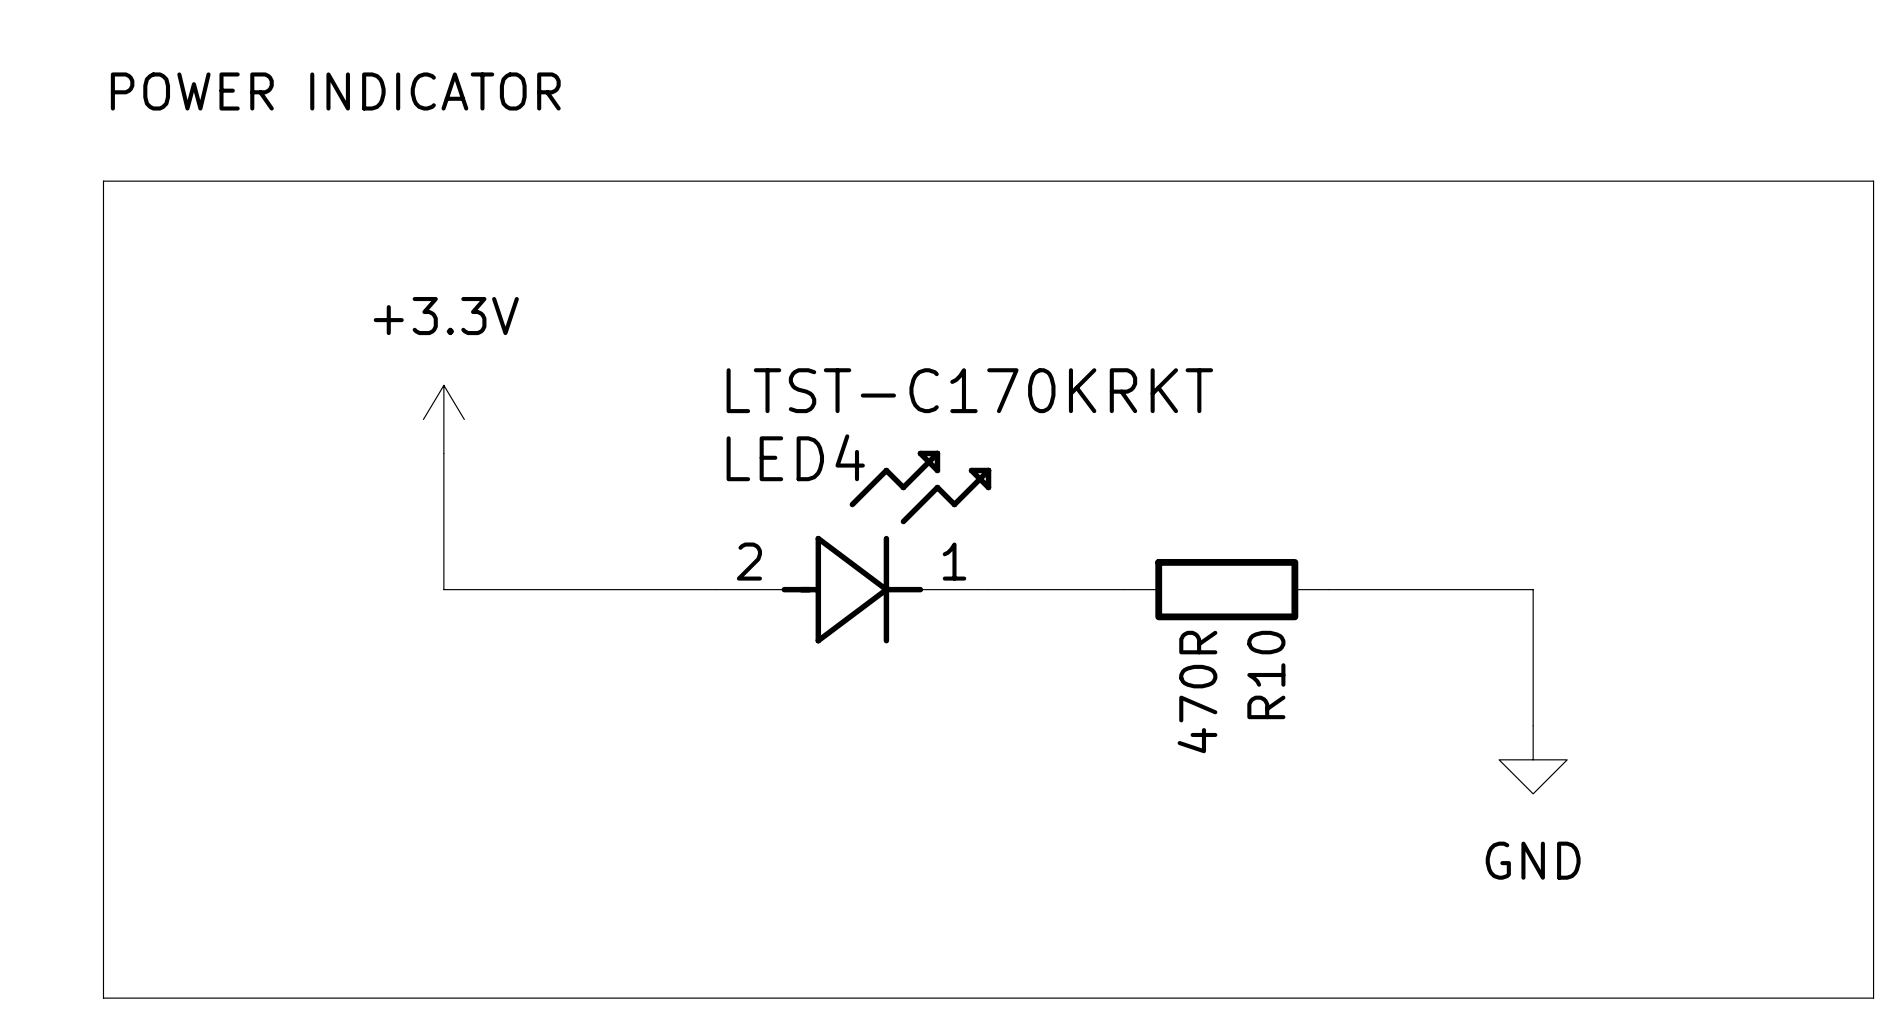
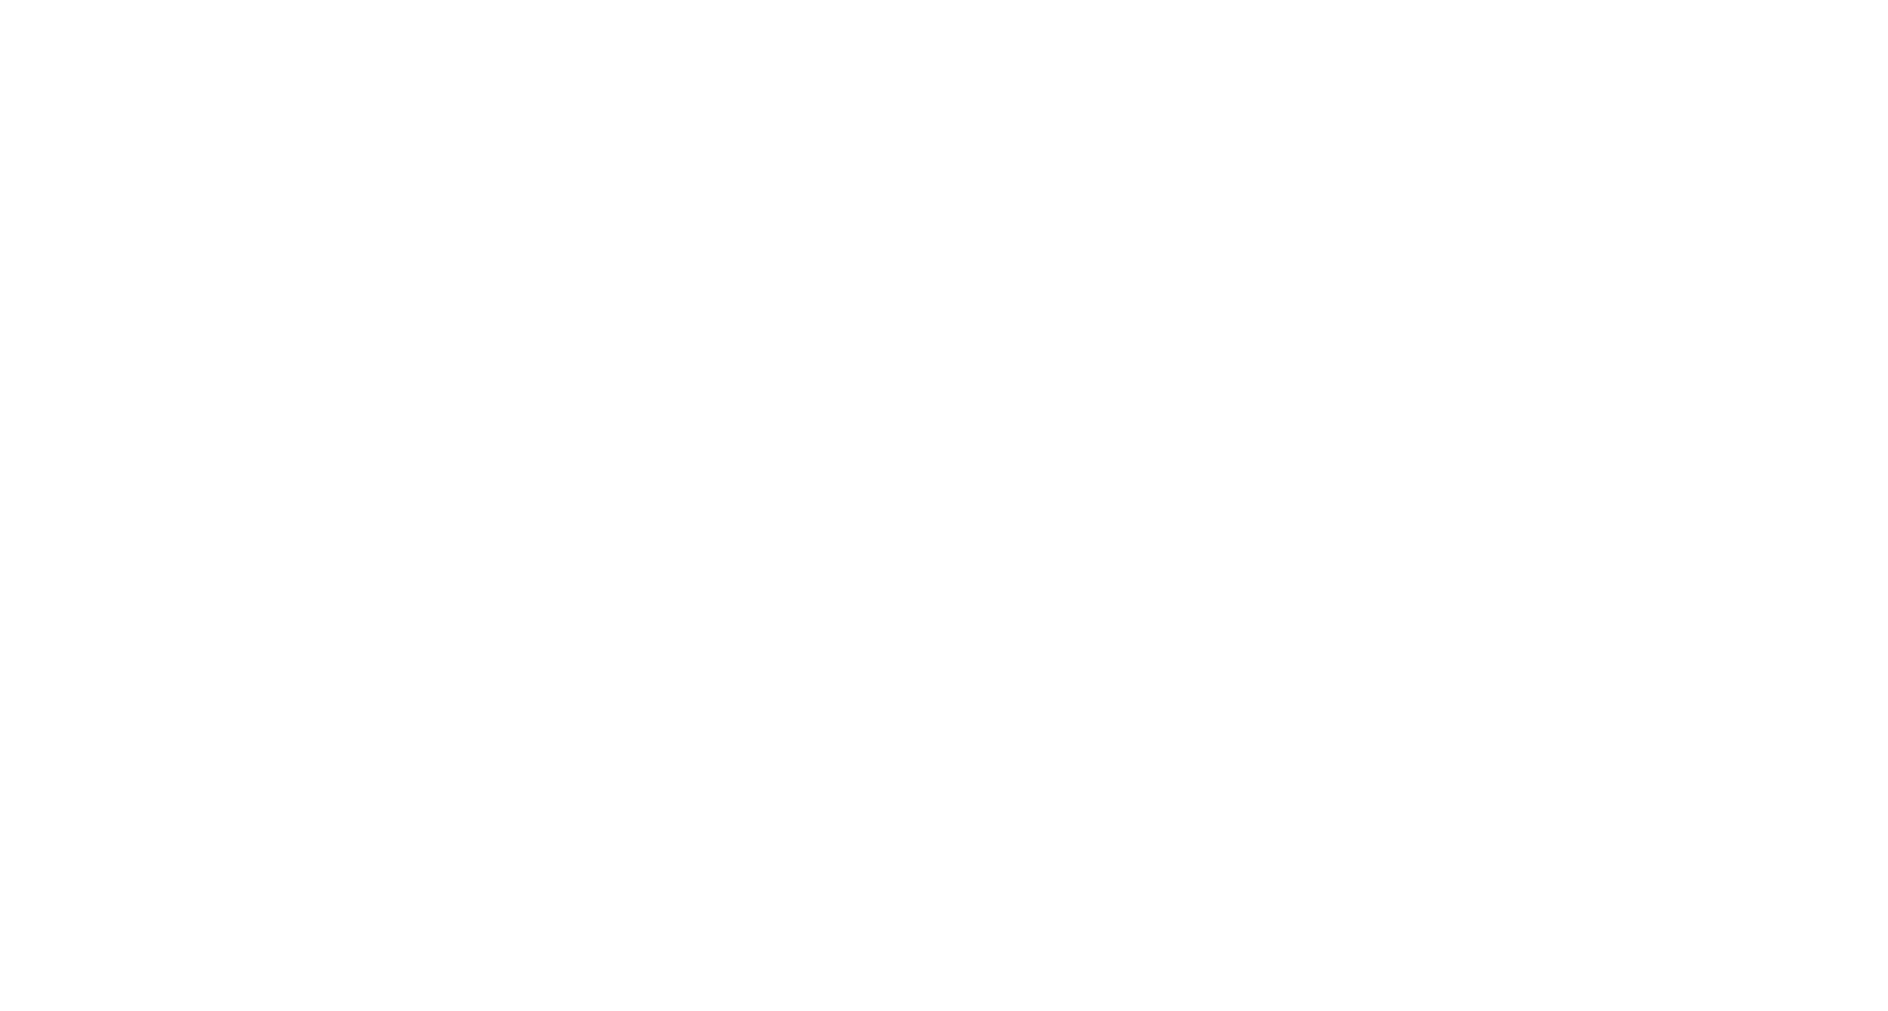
text: POWER INDICATOR (335, 91) -> none
line: (103, 181) (1873, 181) (1873, 998) (103, 998) (103, 181) -> none
power symbol: +3.3V (443, 419) -> none
wire: (443, 453) (443, 589) (716, 589) -> none
LED4: LTST-C170KRKT (853, 547) -> none
wire: (988, 589) (1124, 589) -> none
R10: 470R (1226, 589) -> none
wire: (1328, 589) (1533, 589) (1533, 725) -> none
power symbol: GND (1533, 759) -> none

